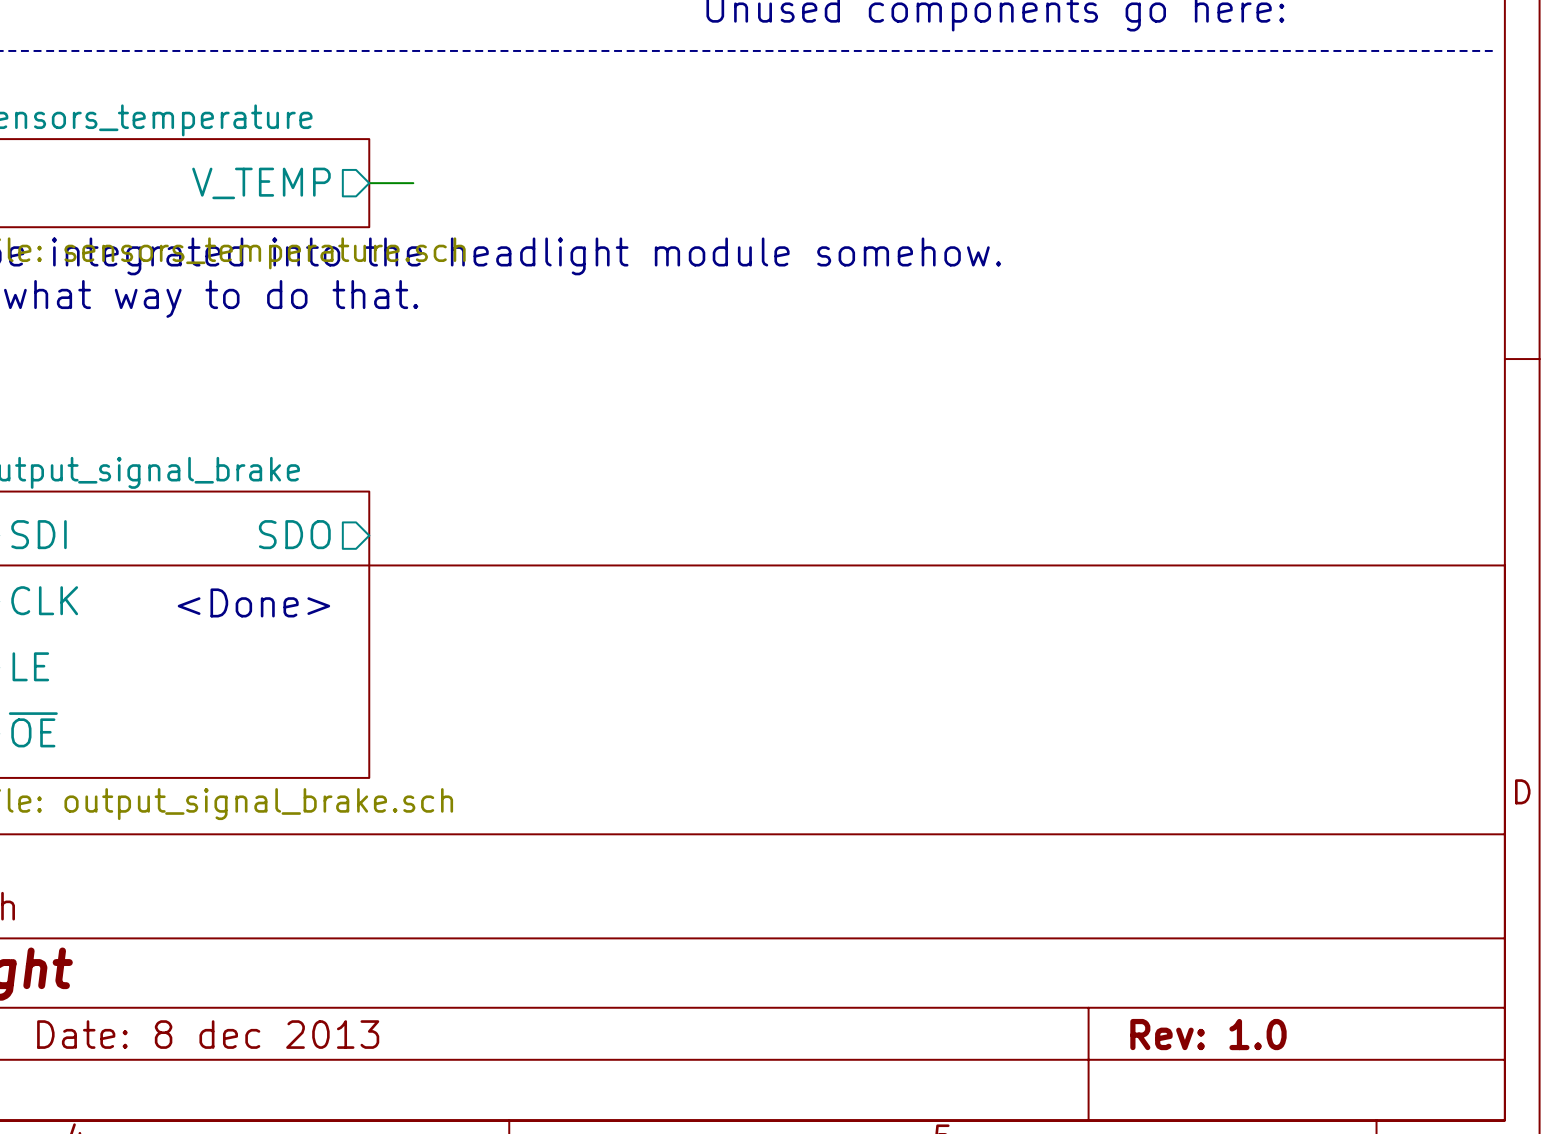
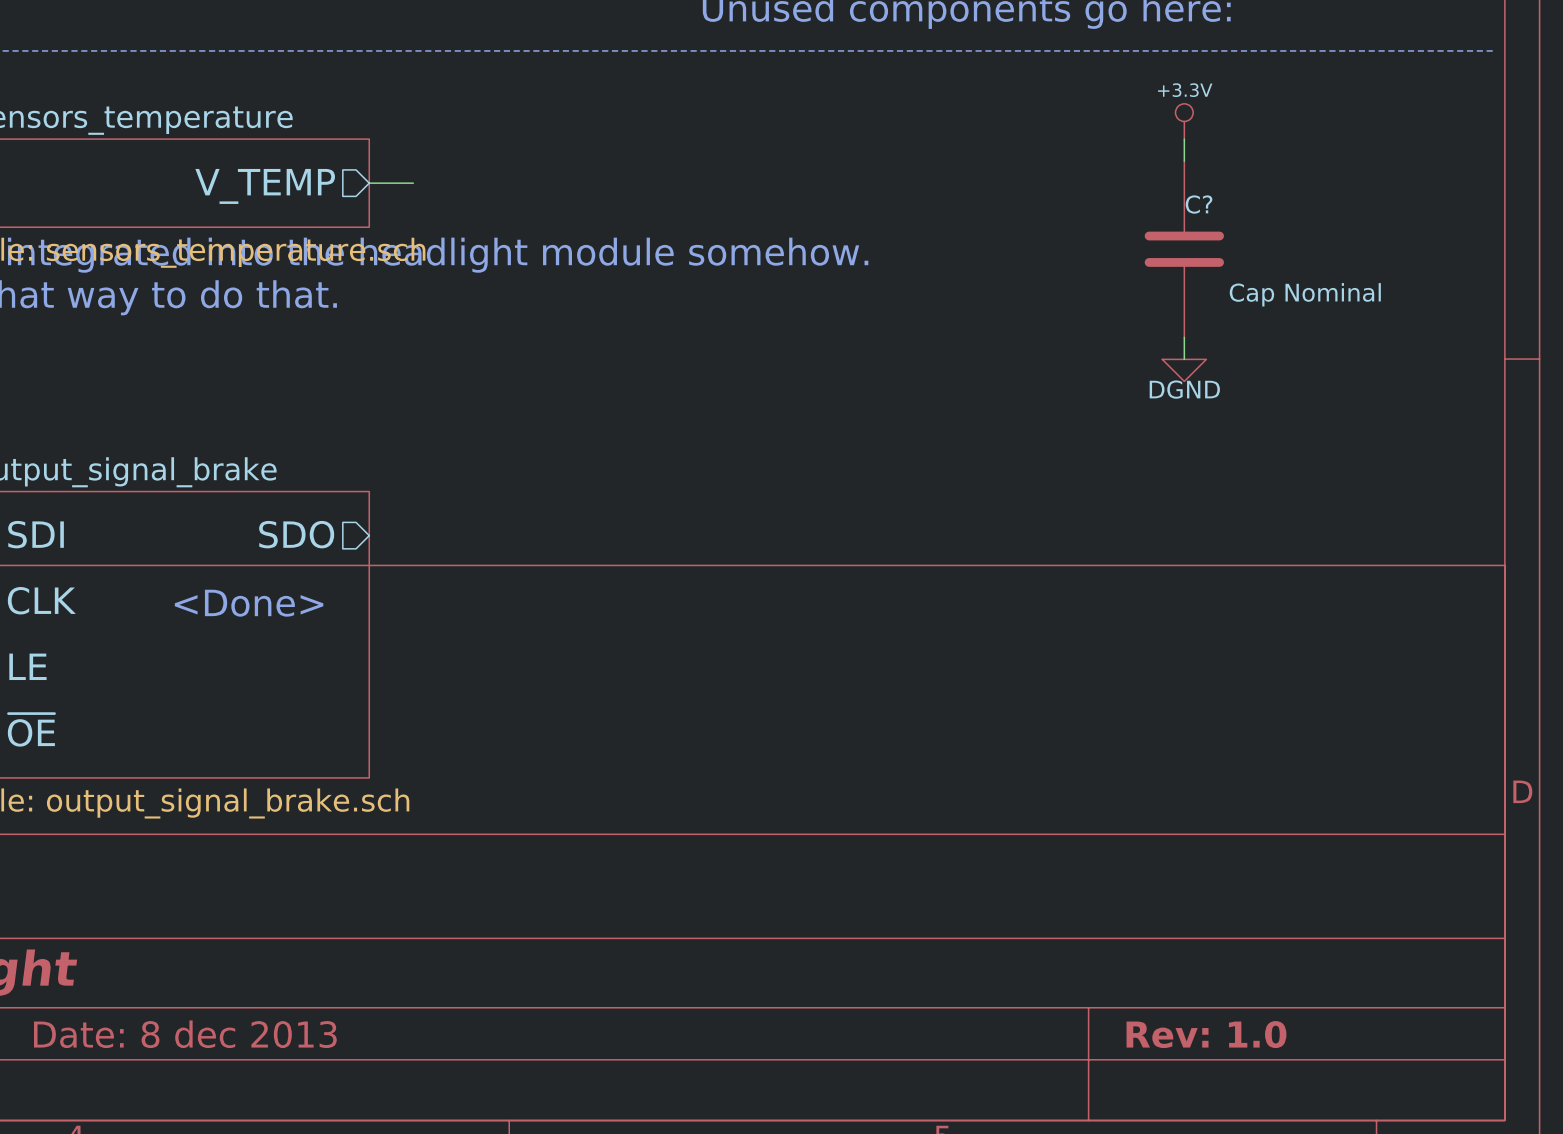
power symbol: none -> +3.3V (1184, 121)
wire: none -> (1184, 139) (1184, 161)
C?: none -> Cap Nominal (1184, 249)
wire: none -> (1184, 337) (1184, 359)
power symbol: none -> DGND (1184, 370)

